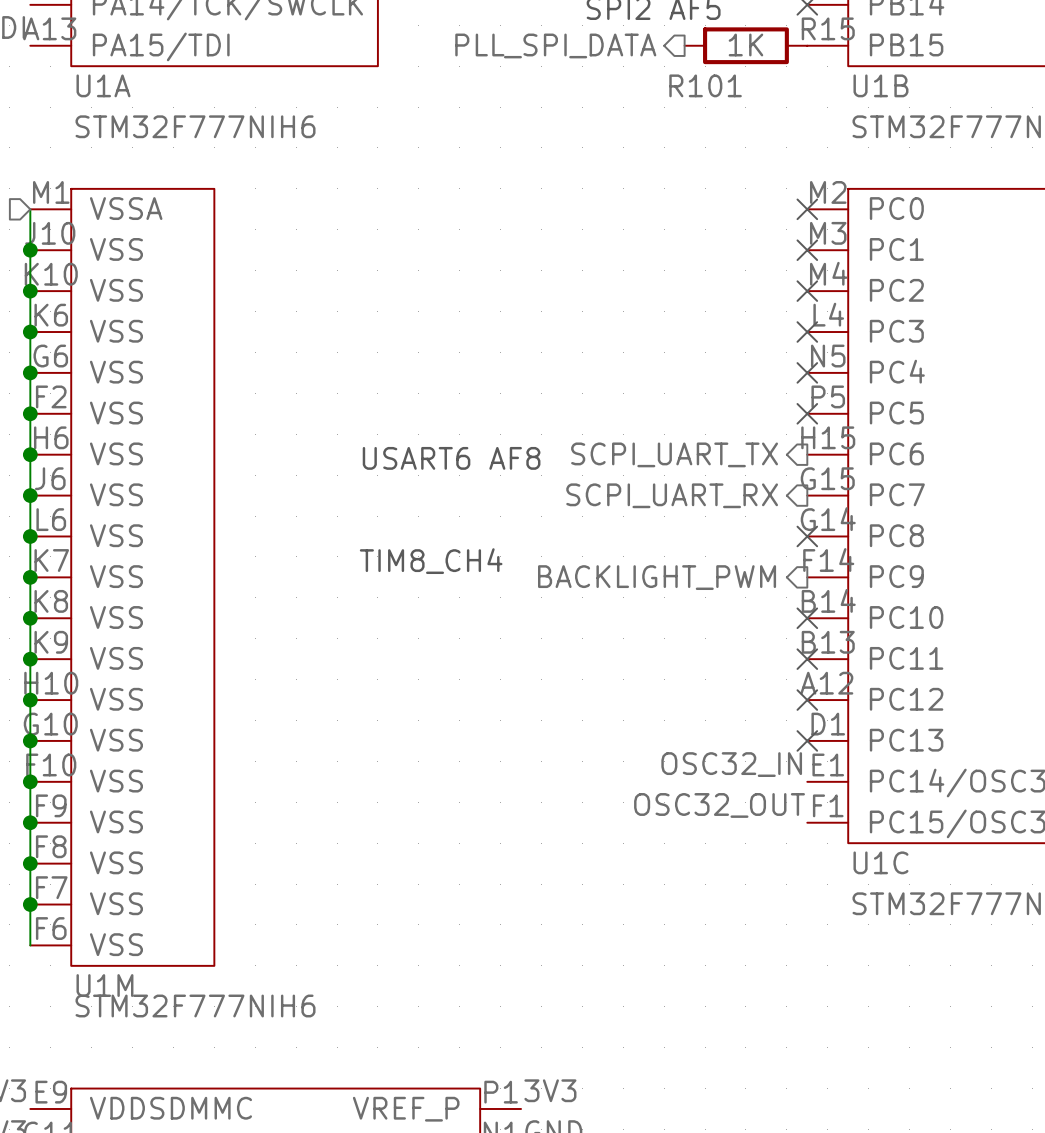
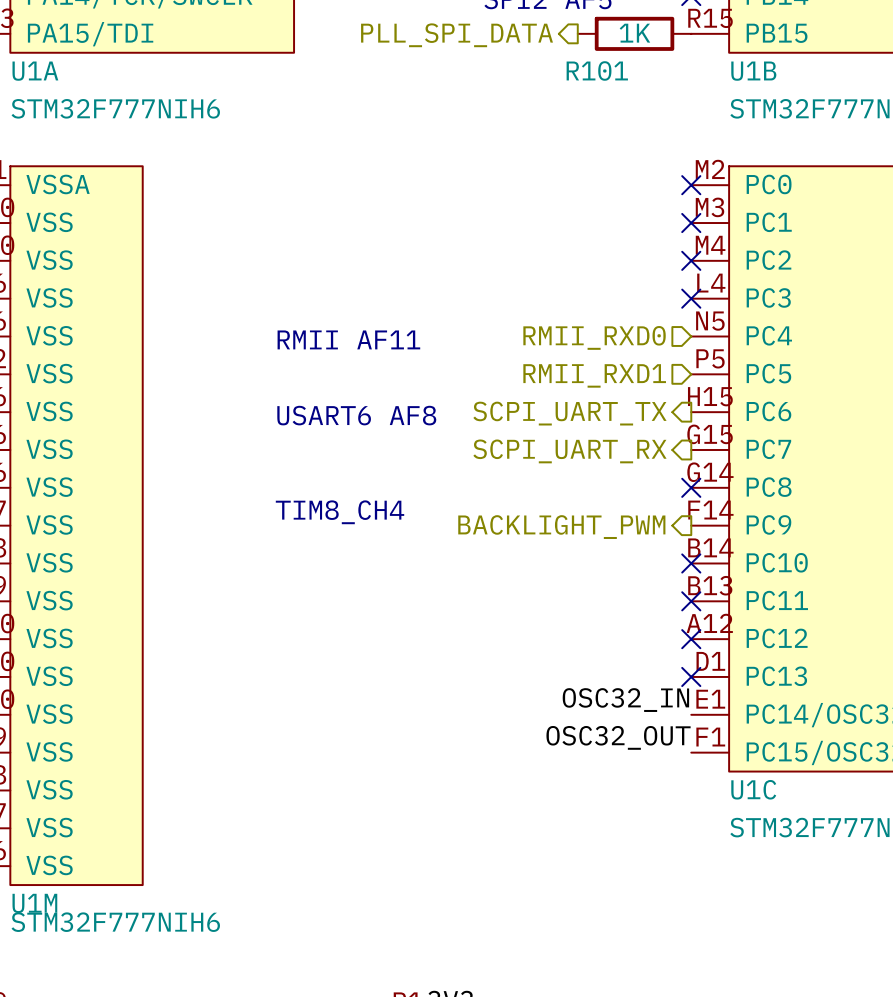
no-connect mark: (807, 372) -> none
hierarchical label: none -> RMII_RXD0 (594, 337)
text: none -> RMII AF11 (348, 339)
no-connect mark: (807, 413) -> none
hierarchical label: none -> RMII_RXD1 (594, 375)

